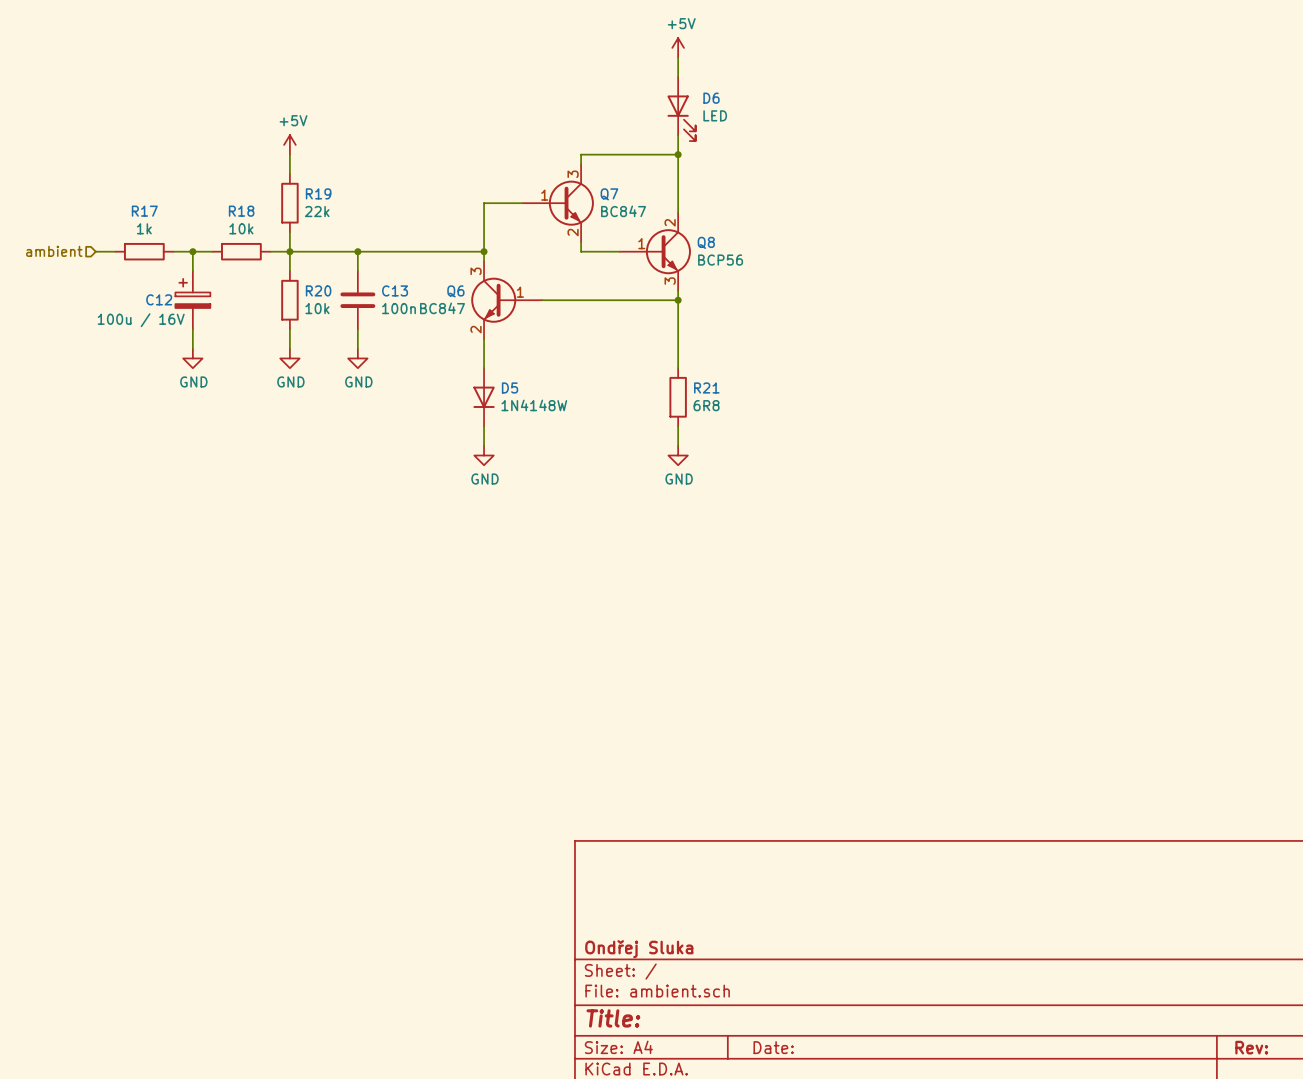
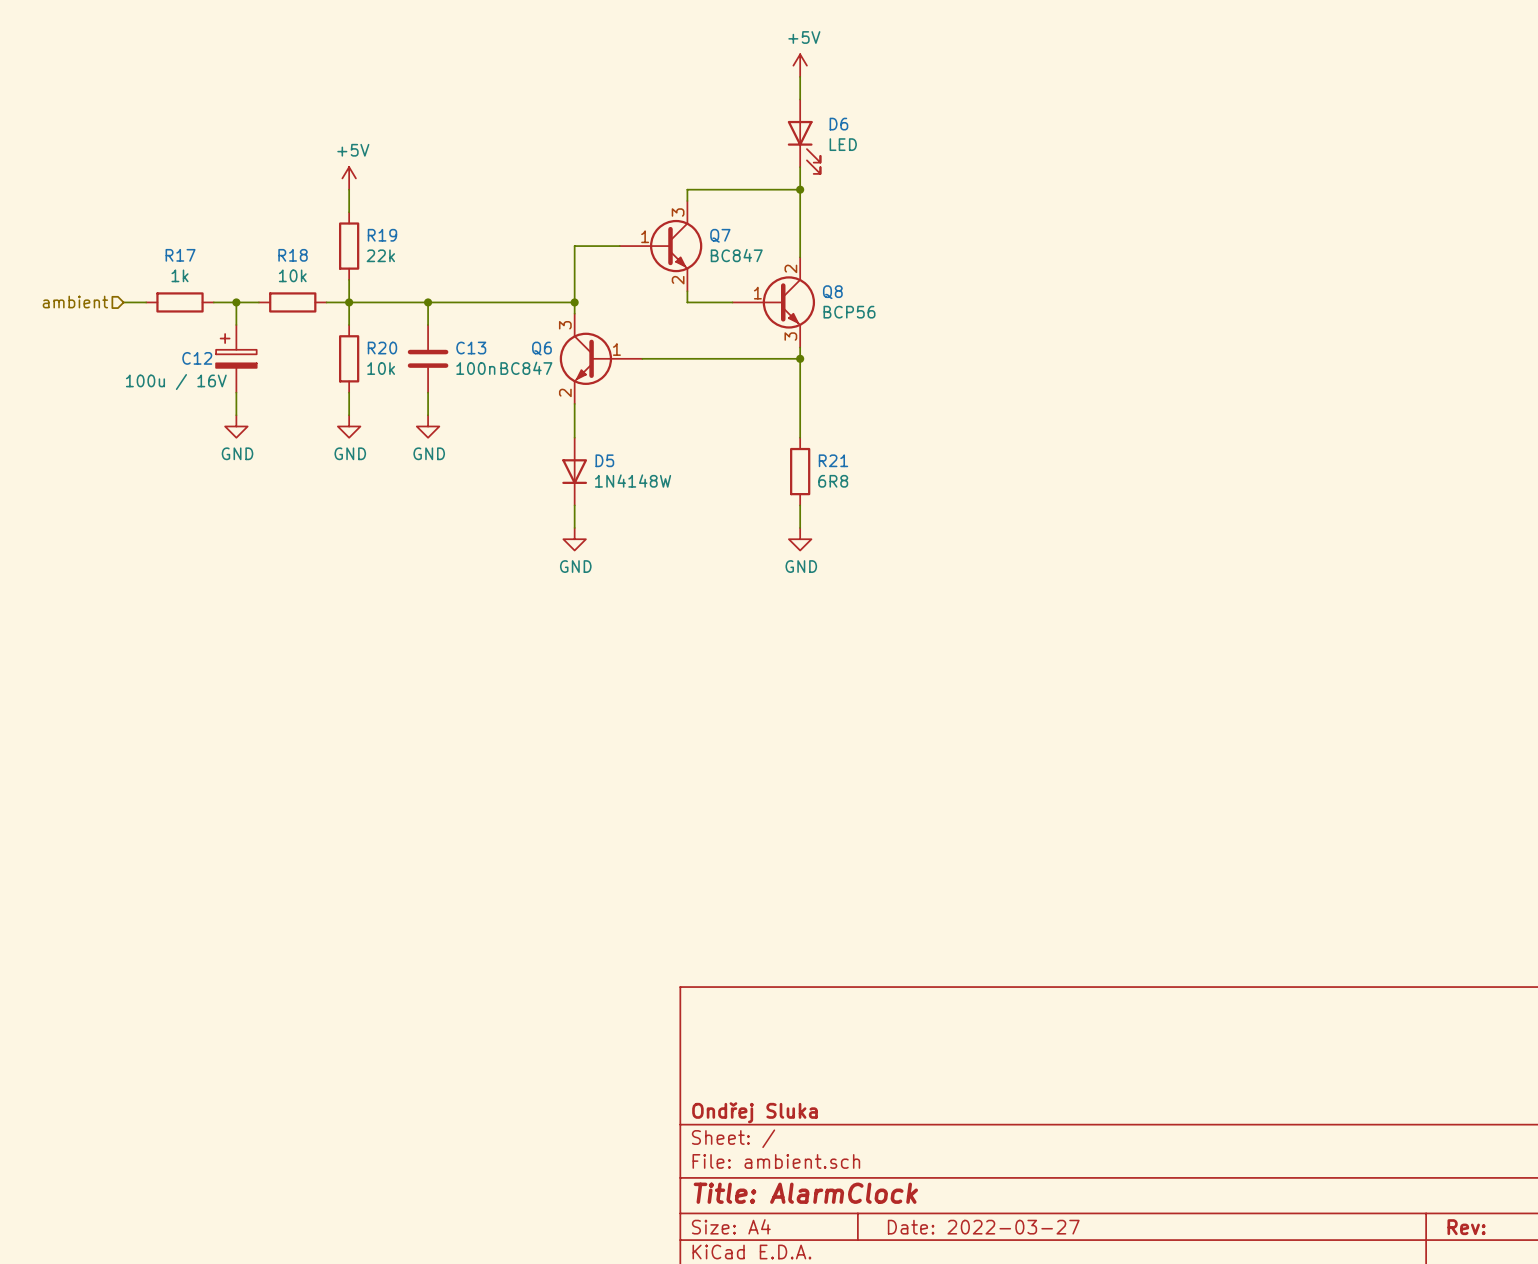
title block: Title: (613, 1018) -> Title: AlarmClock (805, 1193)
title block: Date: (773, 1047) -> Date: 2022-03-27 (983, 1227)

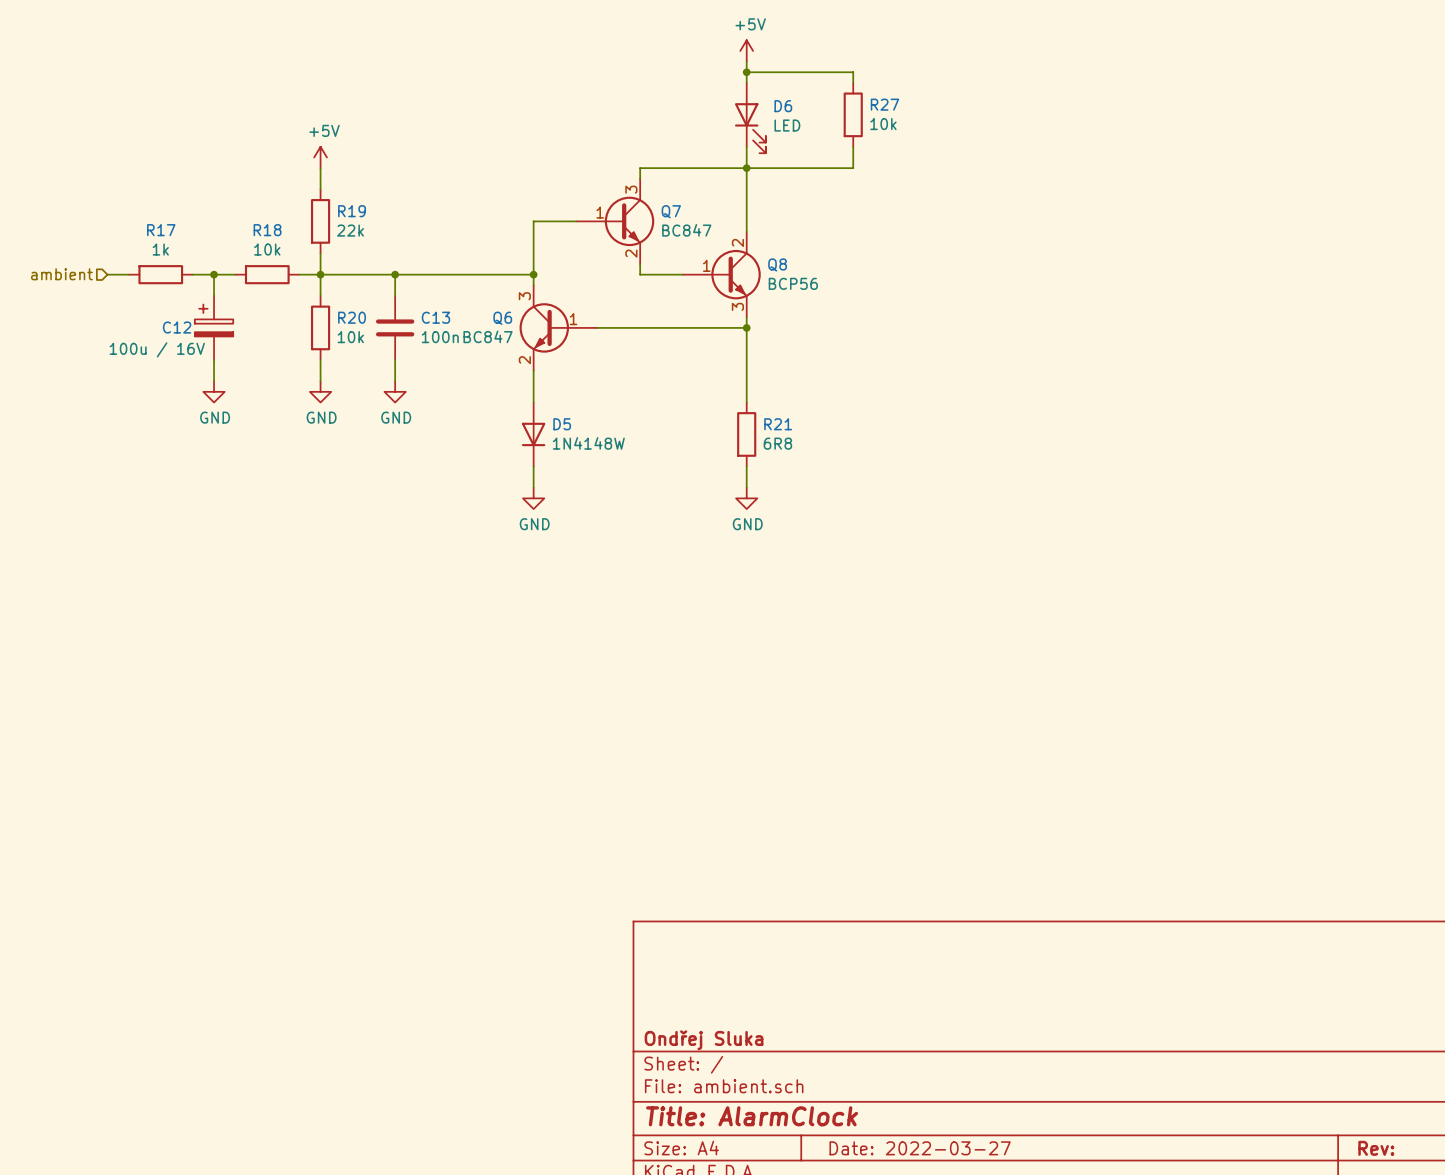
wire: none -> (746, 72) (853, 72) (853, 82)
junction: none -> (746, 72)
R27: none -> 10k (853, 114)
wire: none -> (853, 146) (853, 168) (746, 168)

